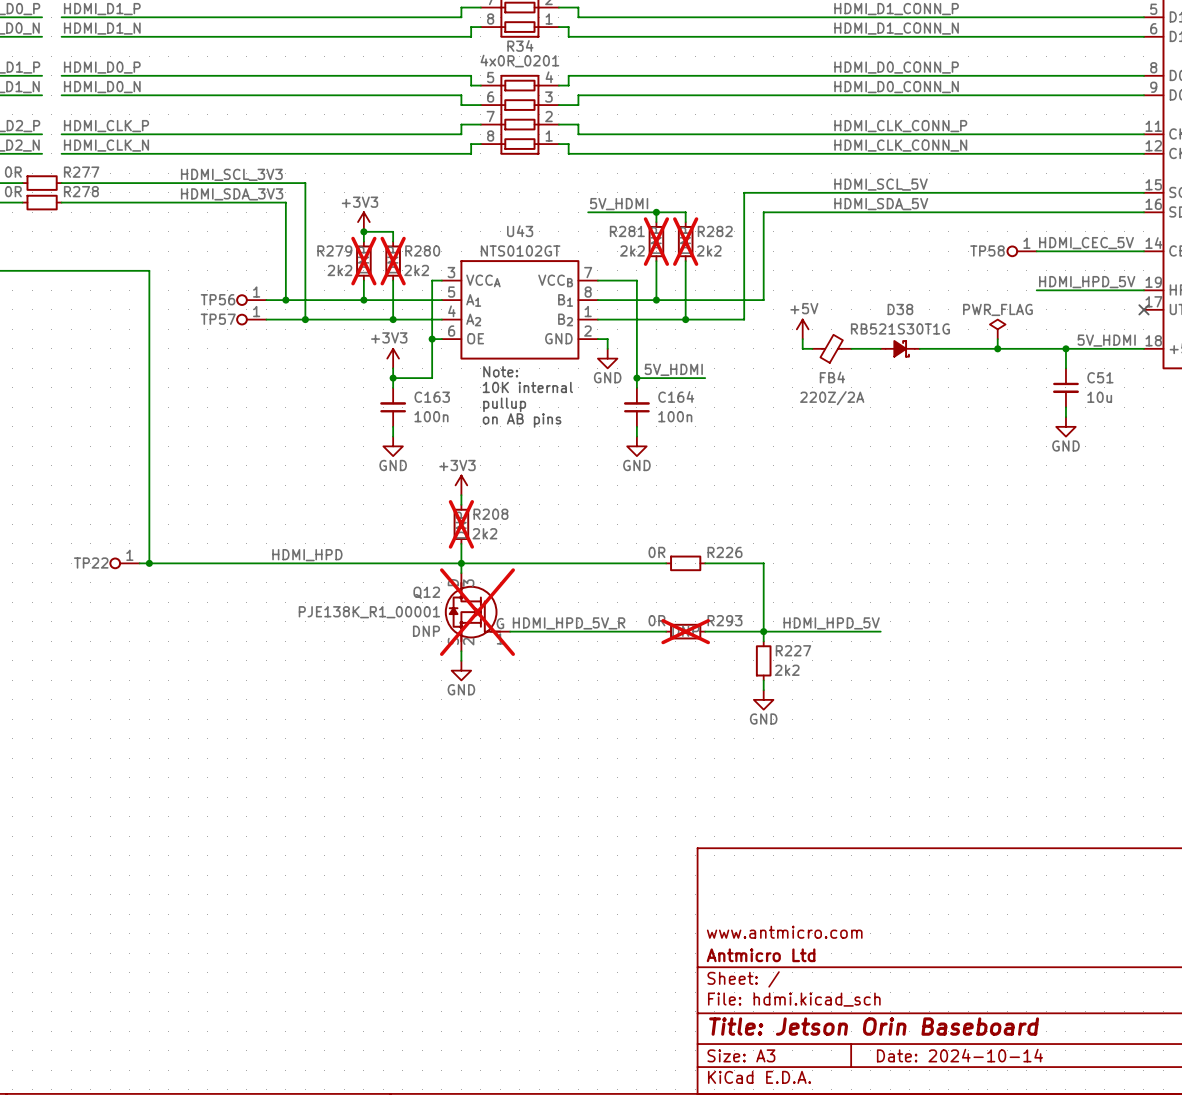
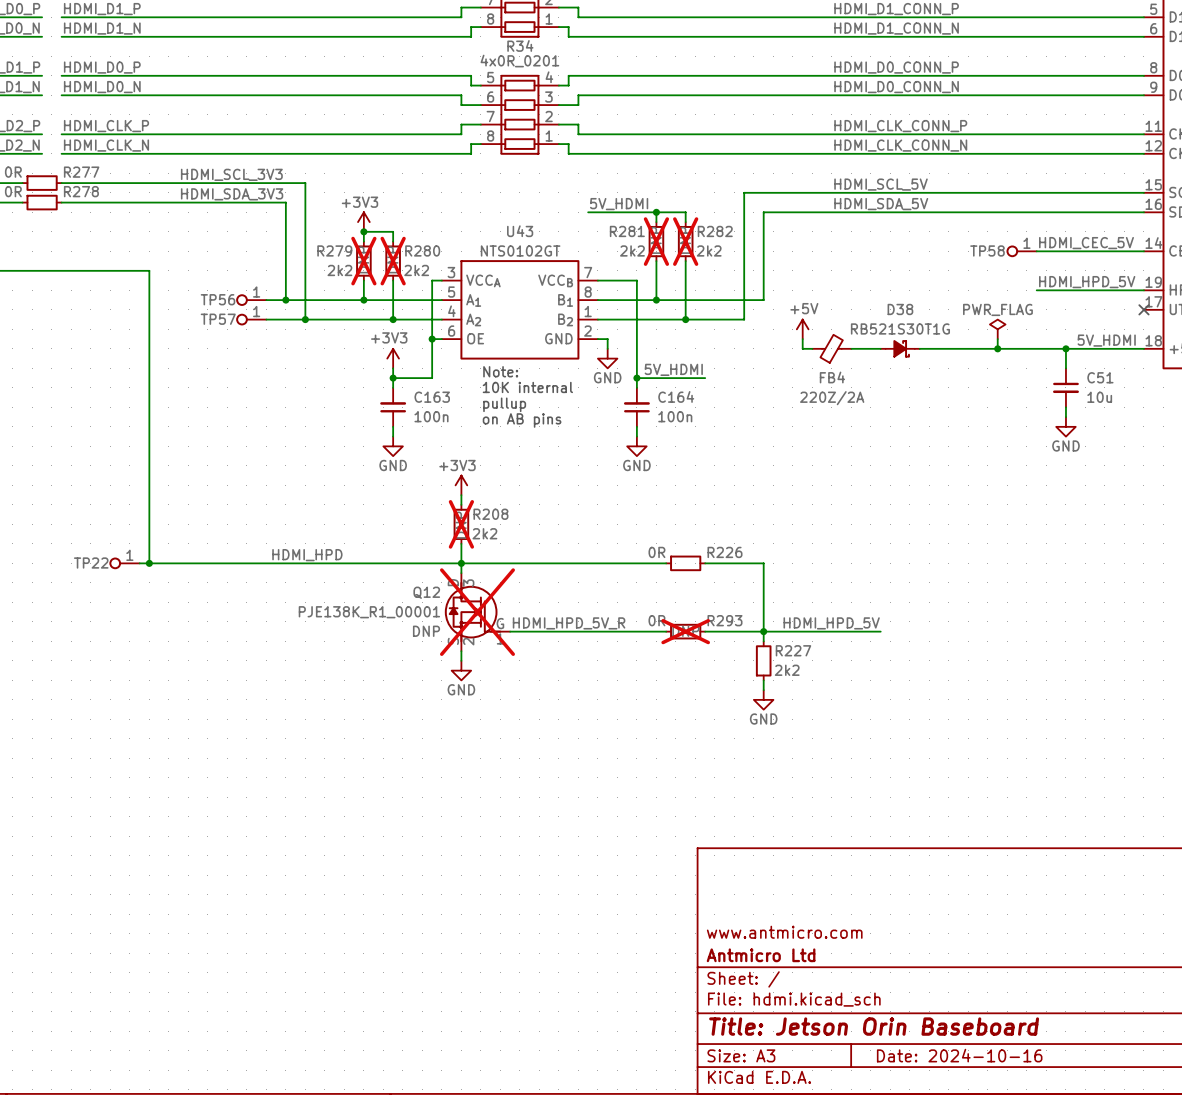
title block: Date: 2024-10-14 (959, 1055) -> Date: 2024-10-16 (959, 1055)

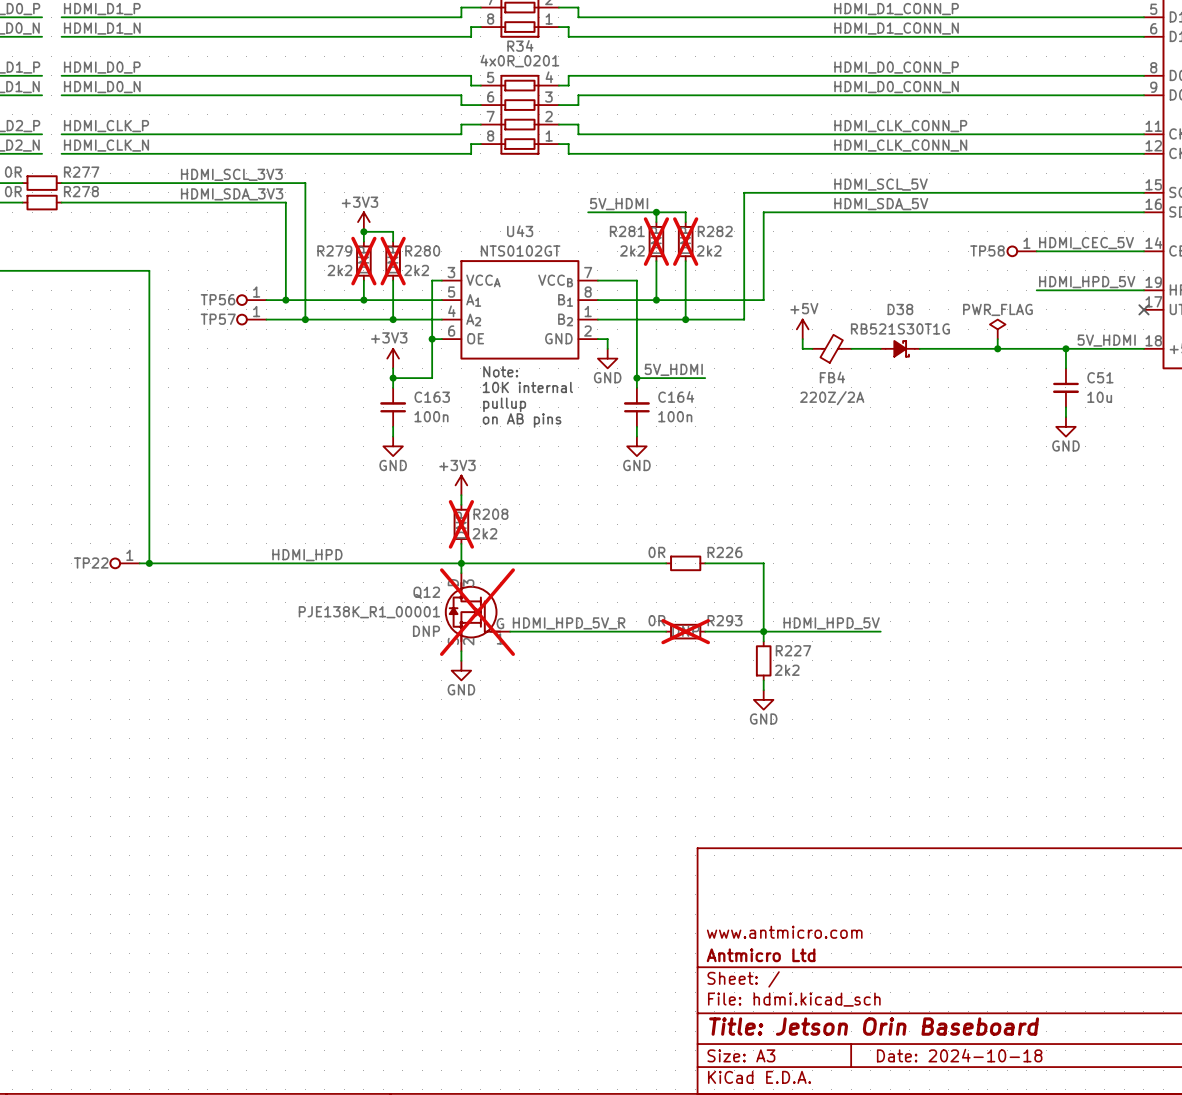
title block: Date: 2024-10-16 (959, 1055) -> Date: 2024-10-18 (959, 1055)

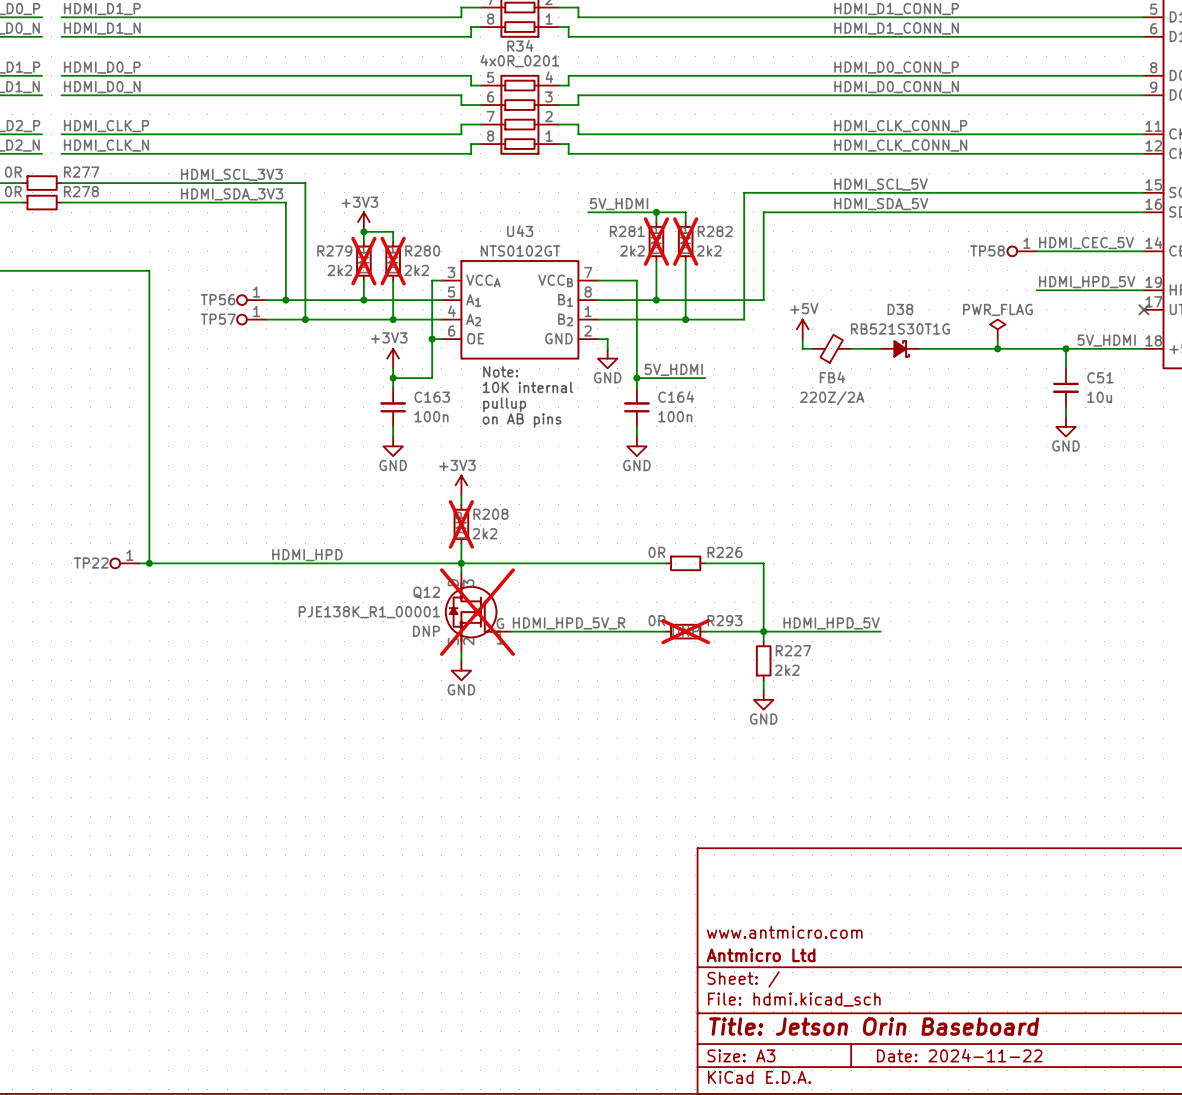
title block: Date: 2024-10-18 (959, 1055) -> Date: 2024-11-22 (959, 1055)

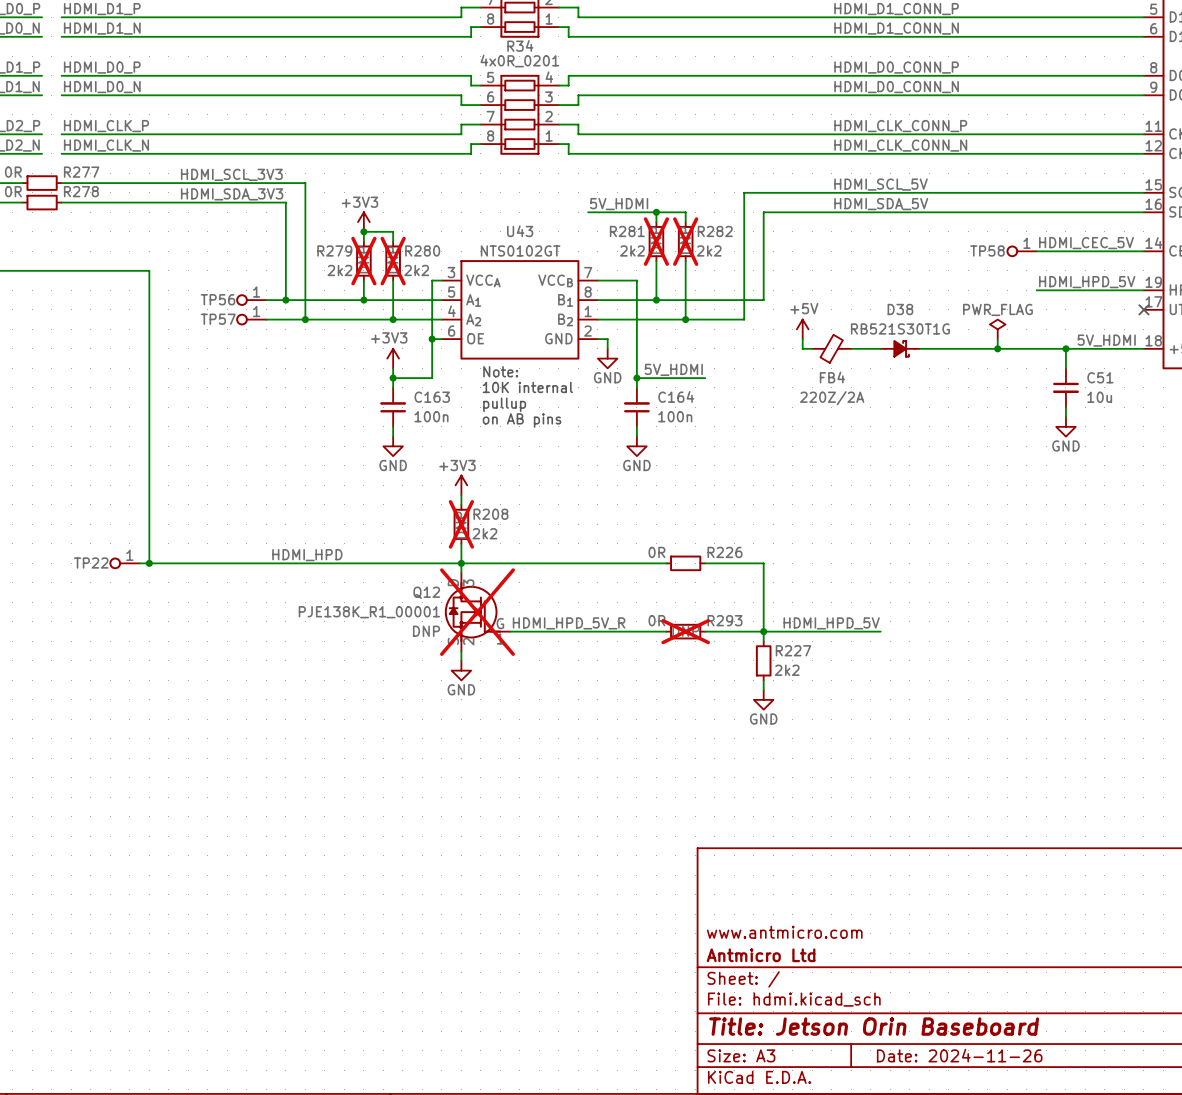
title block: Date: 2024-11-22 (959, 1055) -> Date: 2024-11-26 (959, 1055)

